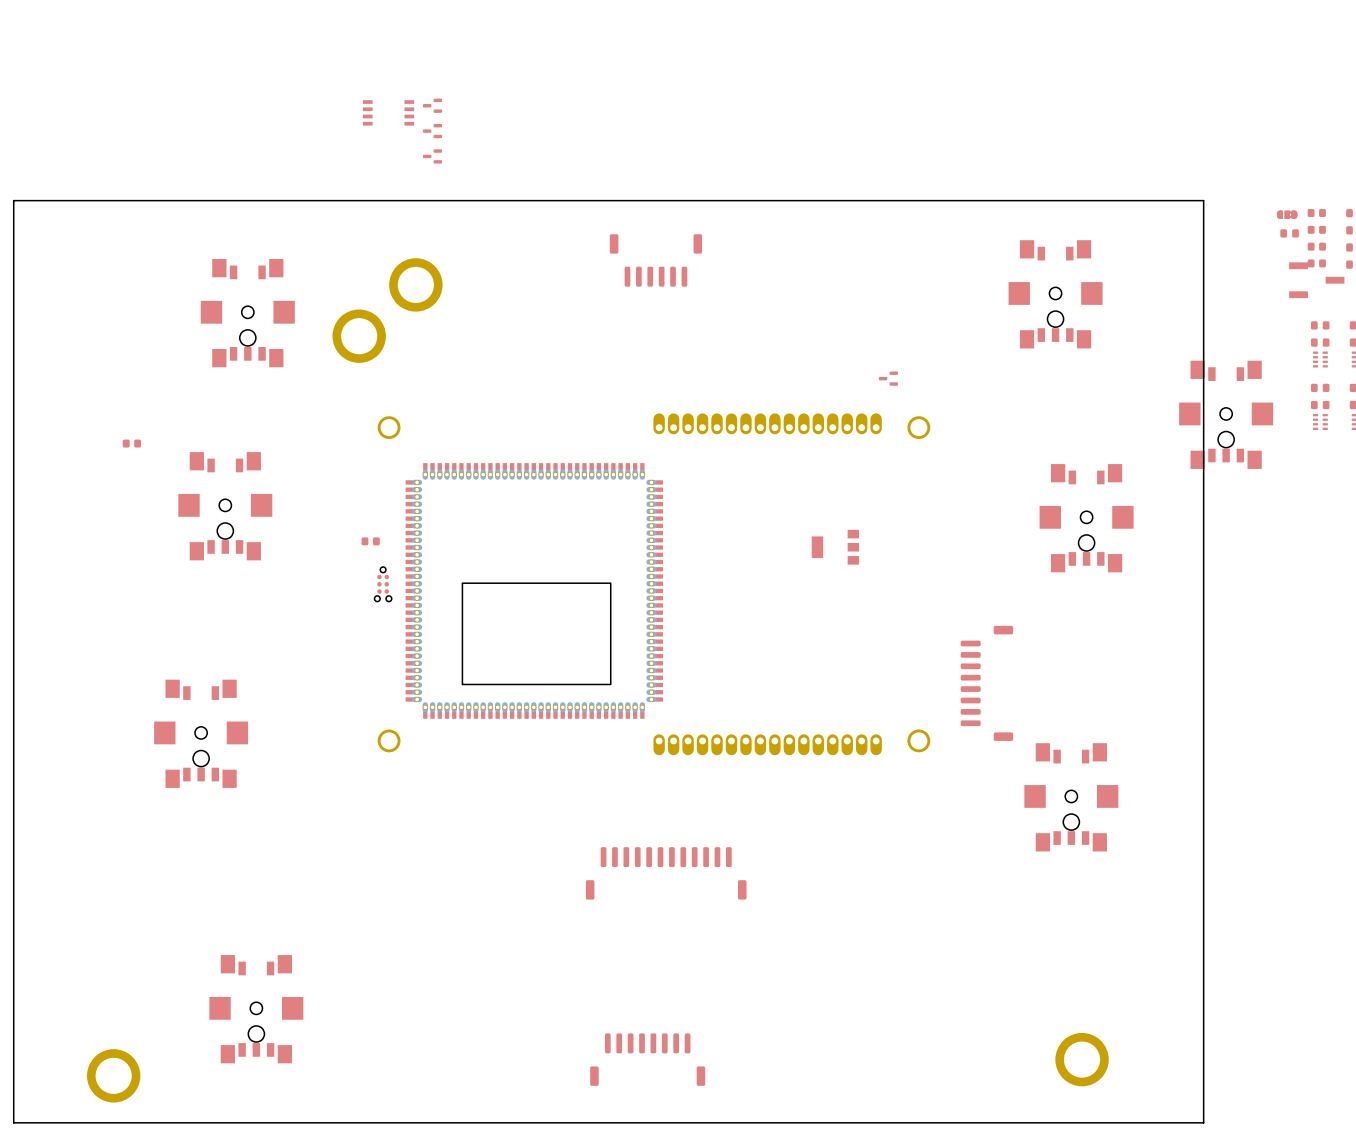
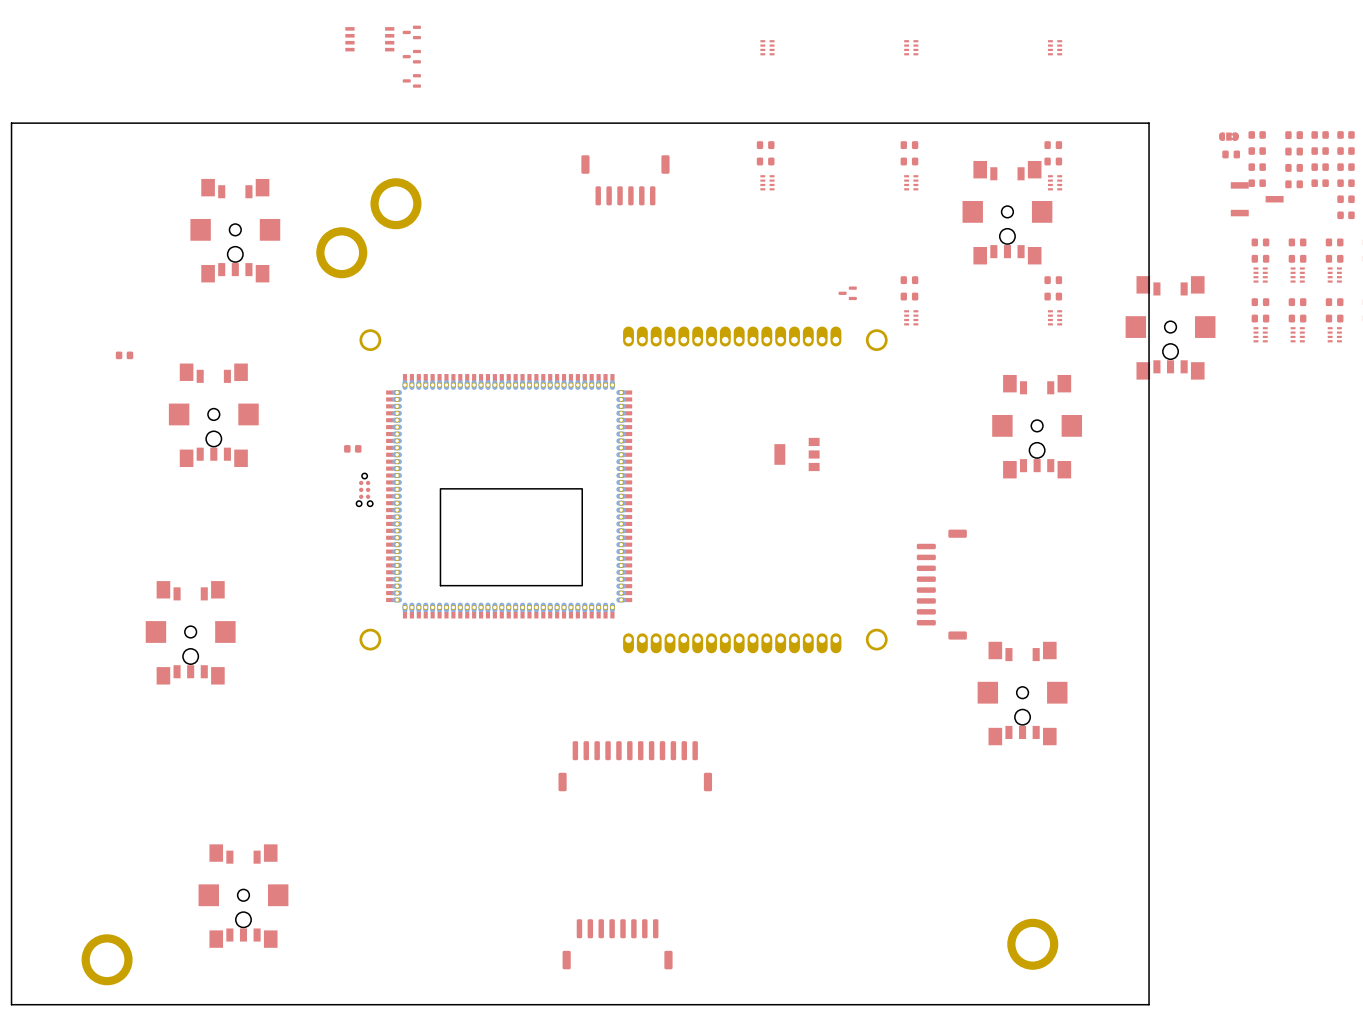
part: none -> (767, 47)
part: none -> (911, 47)
part: none -> (1055, 47)
part: none -> (765, 145)
part: none -> (909, 145)
part: none -> (1053, 145)
part: none -> (765, 161)
part: none -> (909, 161)
part: none -> (1053, 161)
part: none -> (767, 182)
part: none -> (911, 182)
part: none -> (1055, 182)
part: none -> (909, 280)
part: none -> (1053, 280)
part: none -> (909, 296)
part: none -> (1053, 296)
part: none -> (911, 317)
part: none -> (1055, 317)

